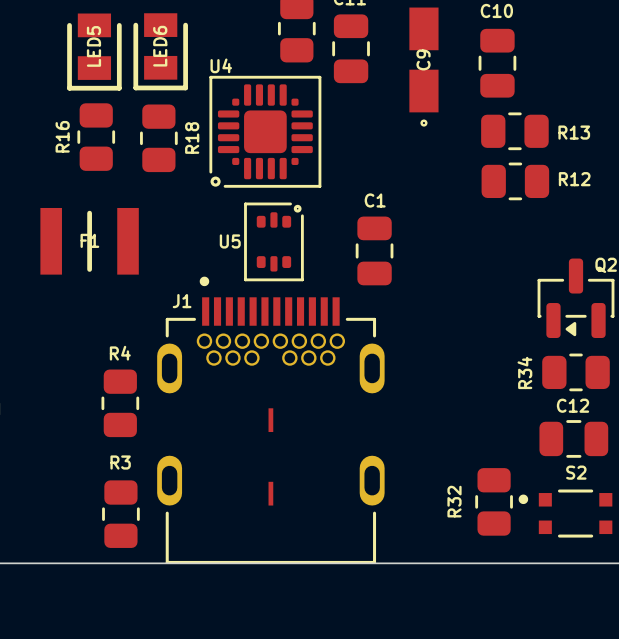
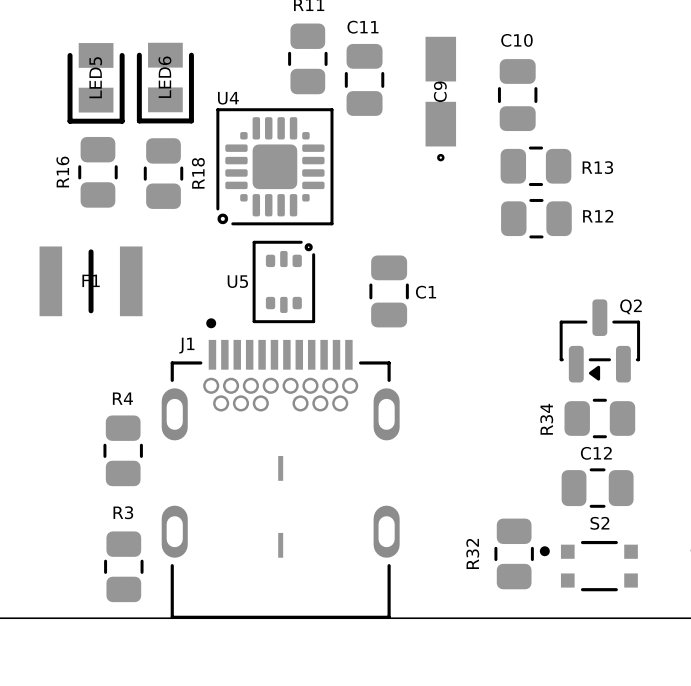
C1 name position: C1 (375, 200) -> C1 (426, 292)

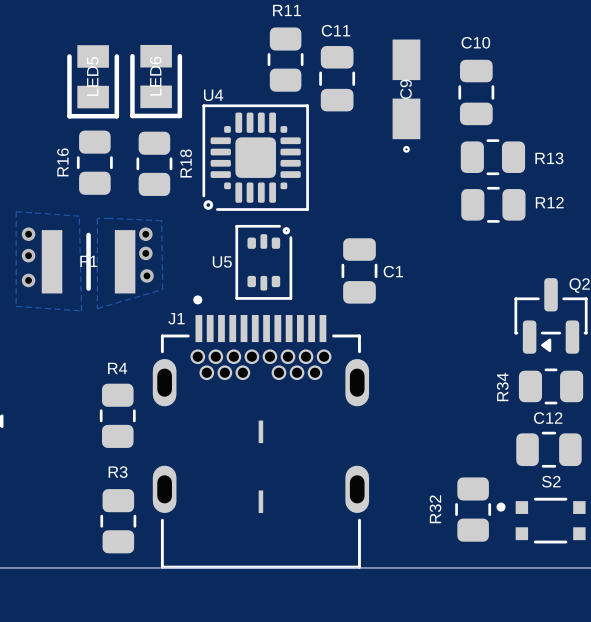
zone outline: none -> (16, 211) (79, 216) (81, 310) (16, 306) (16, 211)
zone outline: none -> (97, 218) (161, 220) (162, 289) (97, 308) (97, 218)
via: none -> (28, 234)
via: none -> (145, 234)
via: none -> (145, 253)
via: none -> (28, 255)
via: none -> (146, 275)
via: none -> (28, 280)

